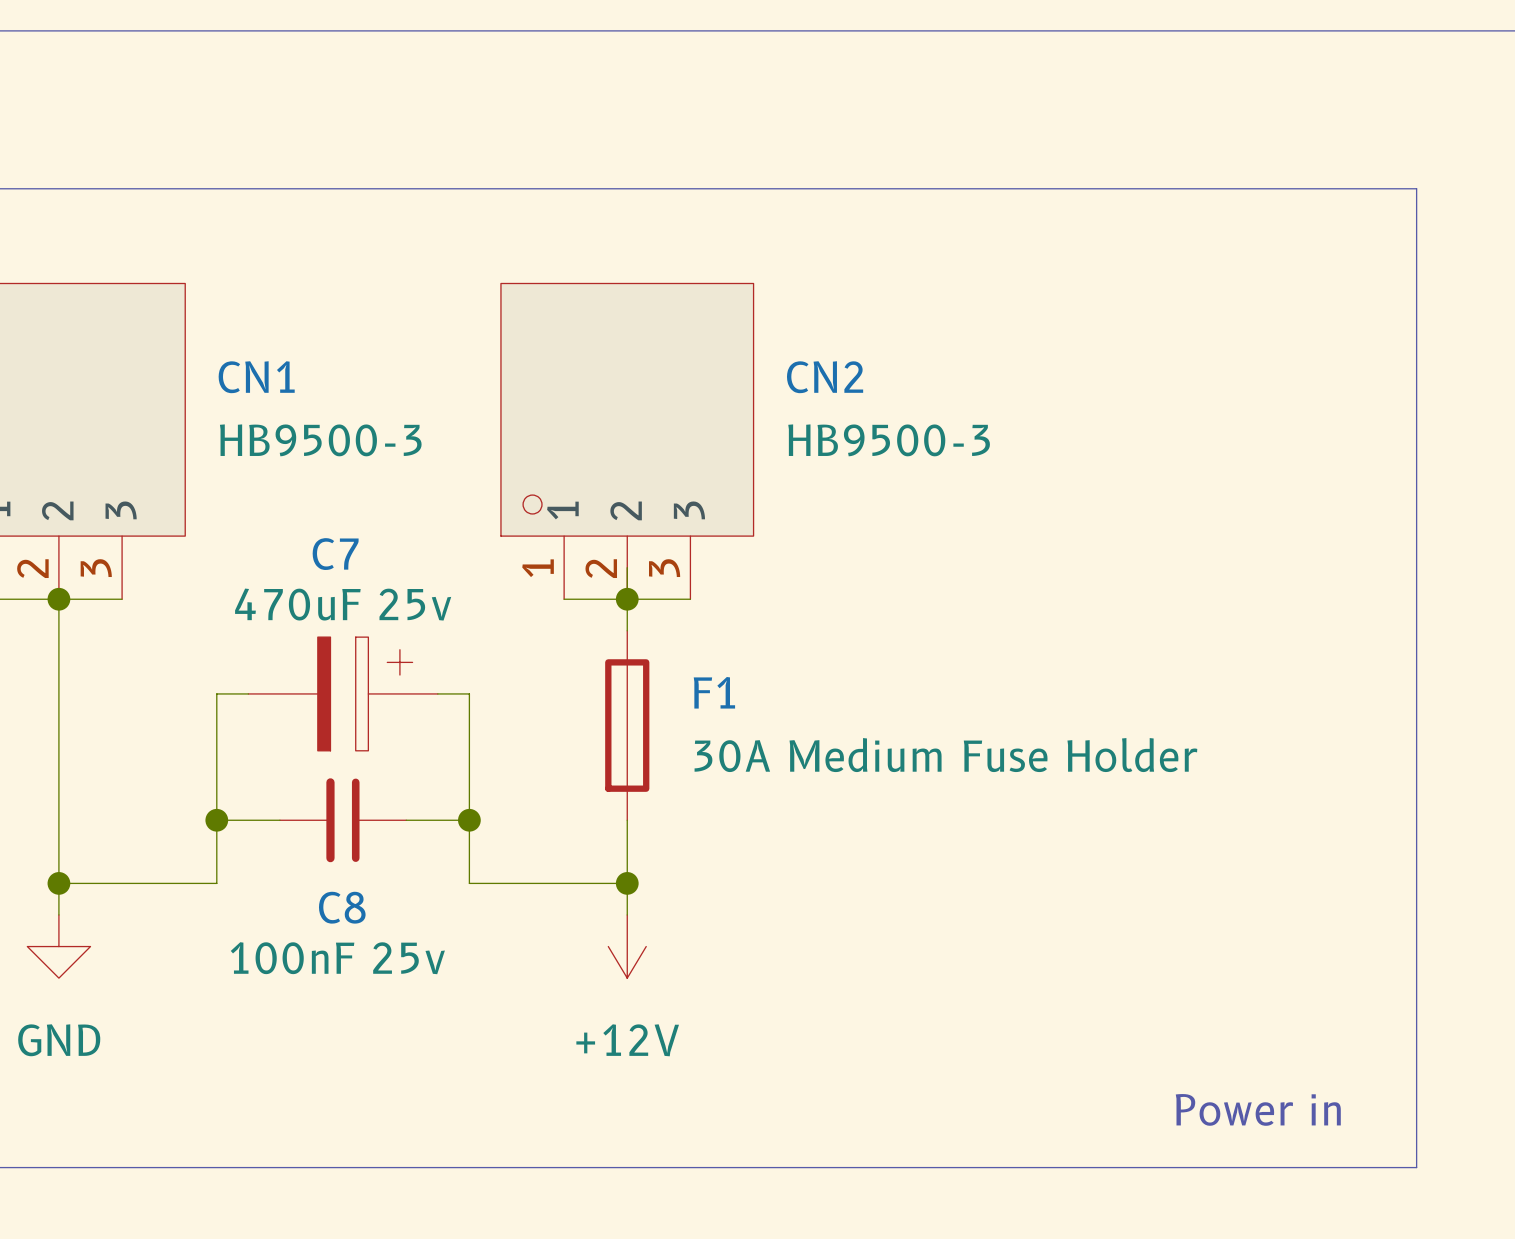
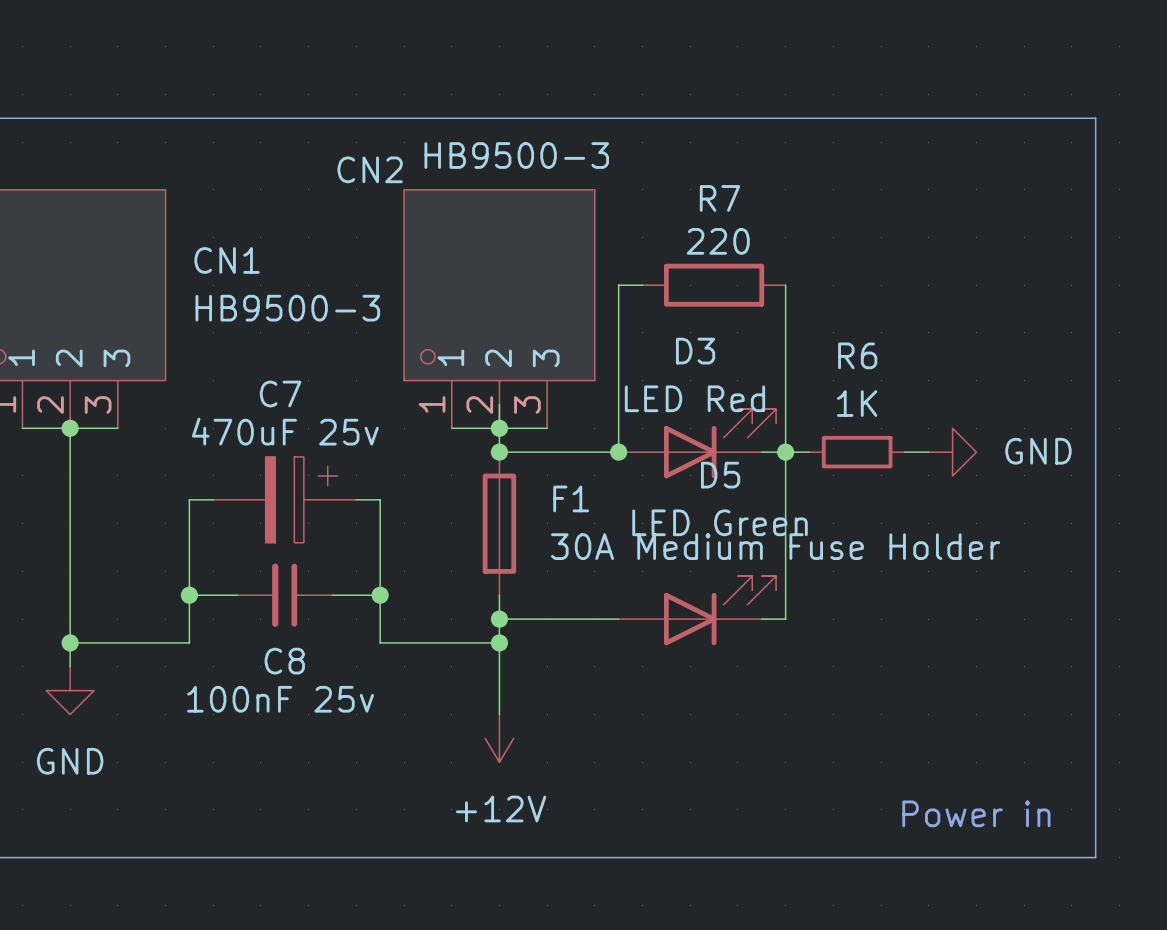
CN2 name position: CN2 (825, 377) -> CN2 (370, 169)
wire: none -> (642, 285) (618, 285) (618, 452) (499, 452)
R7: none -> 220 (714, 285)
wire: none -> (785, 285) (785, 619) (761, 619)
CN2 value position: HB9500-3 (889, 440) -> HB9500-3 (516, 155)
D3: none -> LED Red (697, 443)
junction: none -> (499, 452)
junction: none -> (618, 452)
wire: none -> (761, 452) (809, 452)
junction: none -> (785, 452)
R6: none -> 1K (857, 452)
wire: none -> (904, 452) (928, 452)
power symbol: none -> GND (952, 452)
D5: none -> LED Green (697, 610)
wire: none -> (499, 619) (618, 619)
junction: none -> (499, 619)
power symbol position: +12V (627, 946) -> +12V (499, 738)

